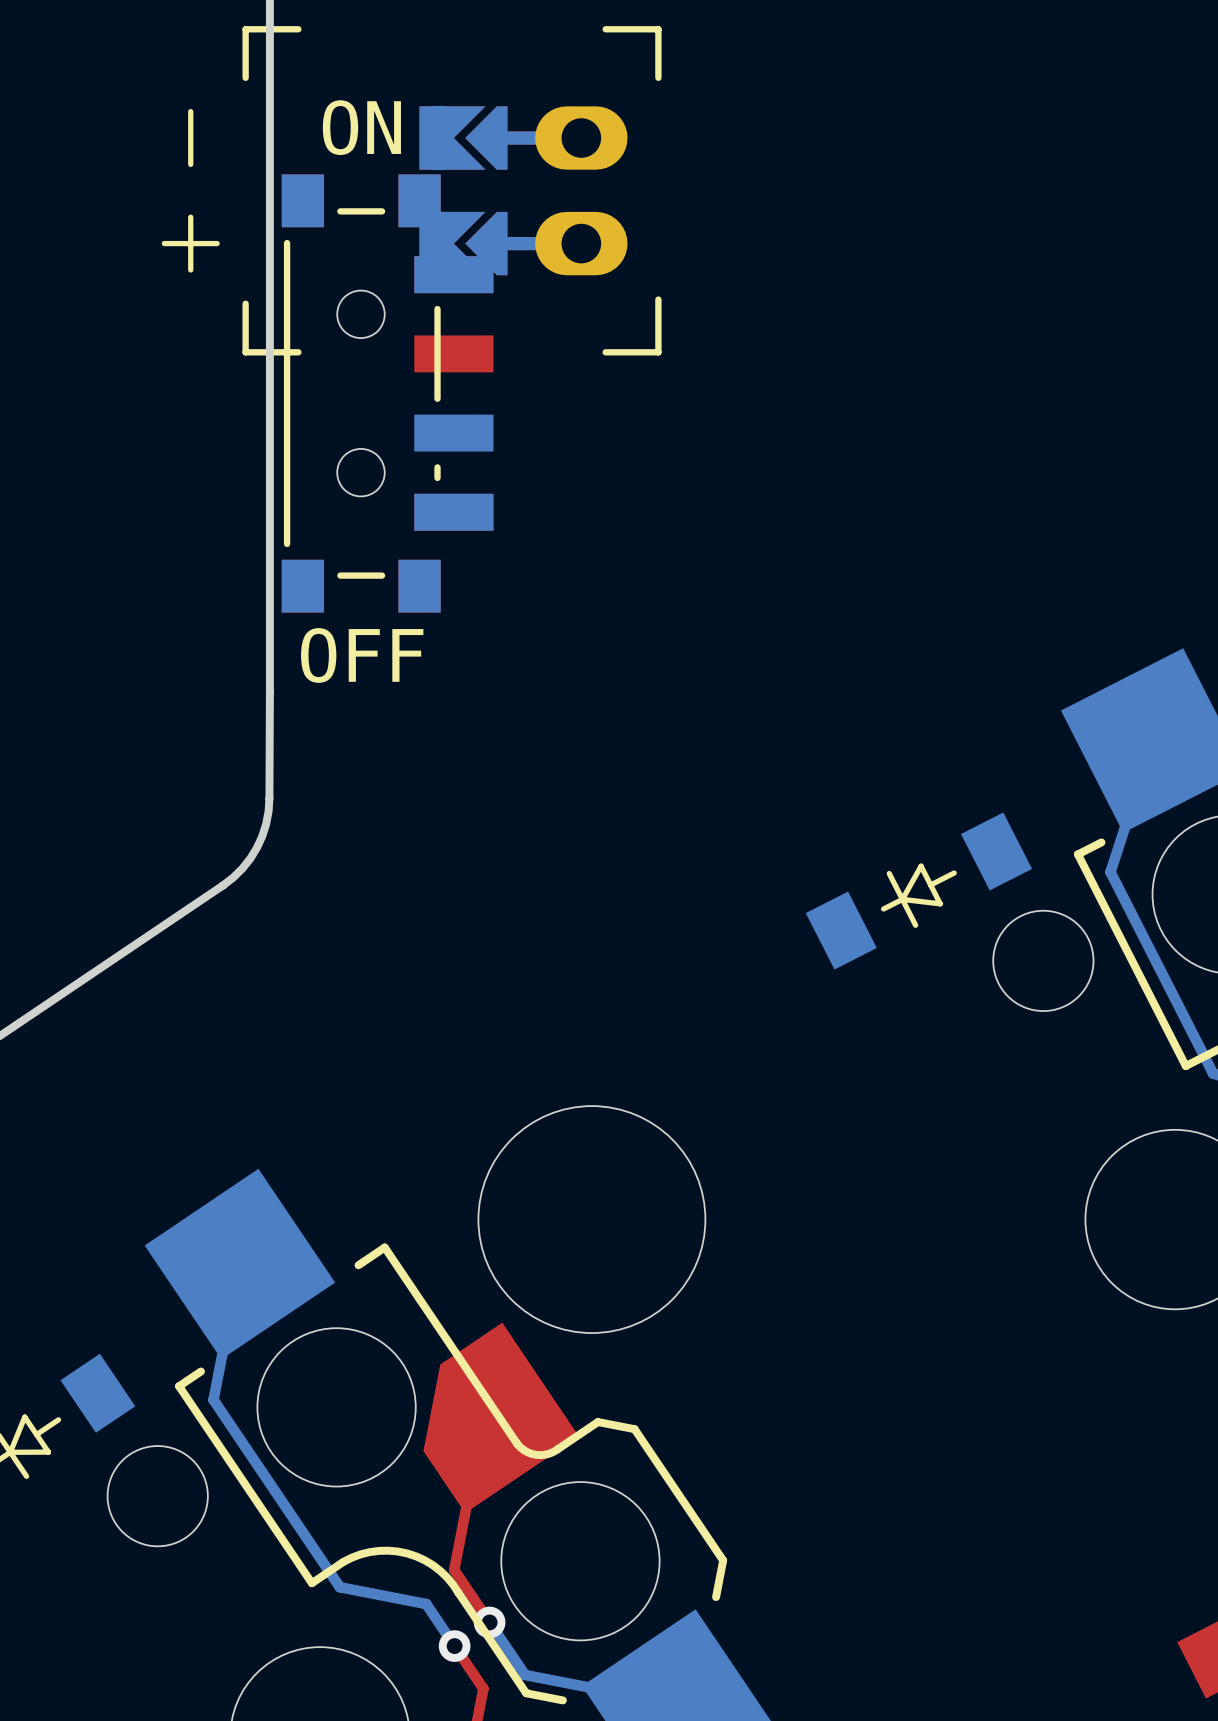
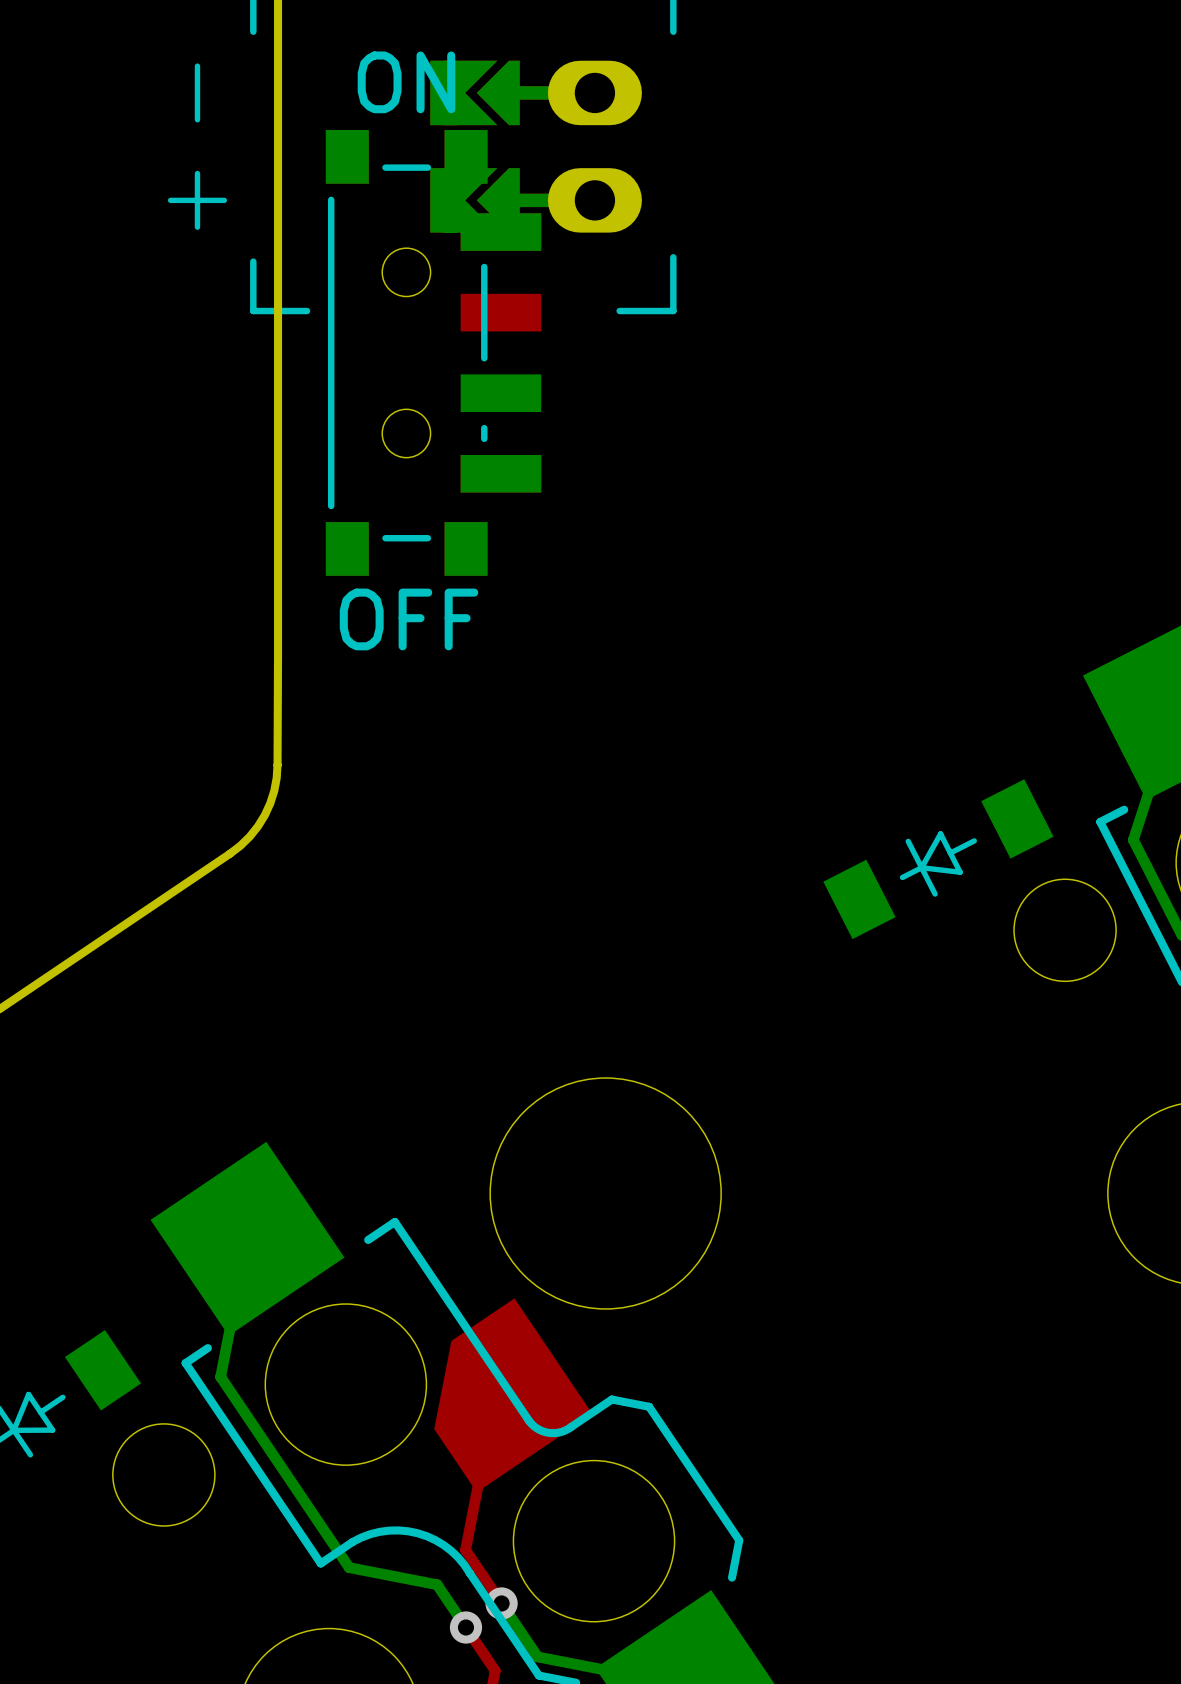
part position: (387, 393) -> (433, 352)

